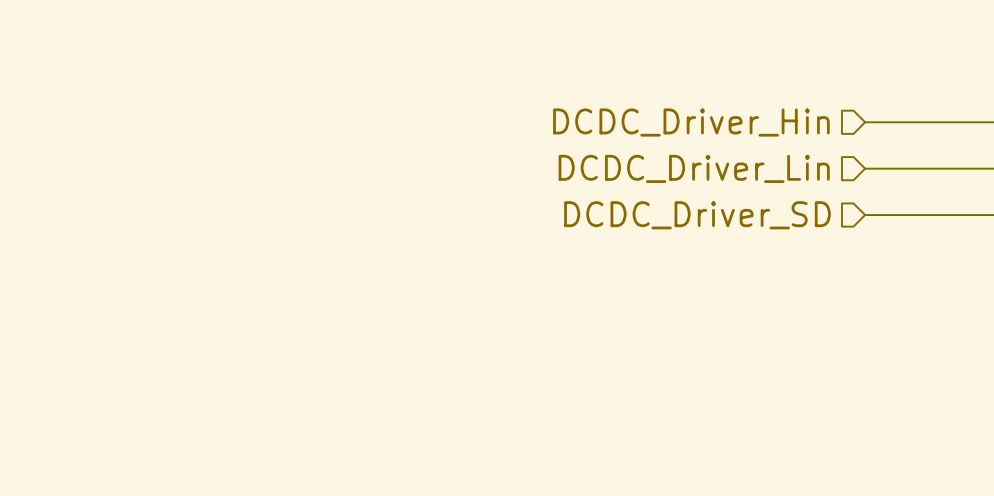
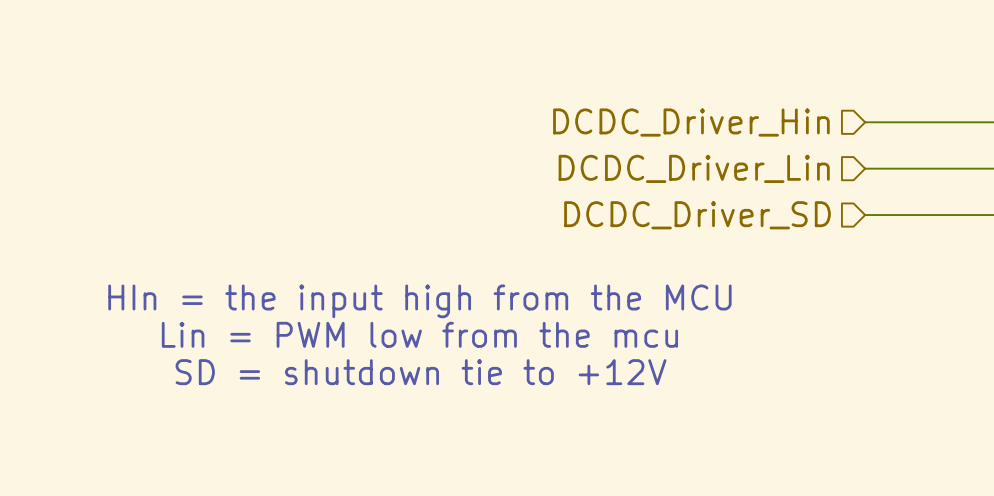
text: none -> HIn = the input high from the MCU (419, 301)
text: none -> Lin = PWM low from the mcu (419, 334)
text: none -> SD = shutdown tie to +12V (421, 372)

